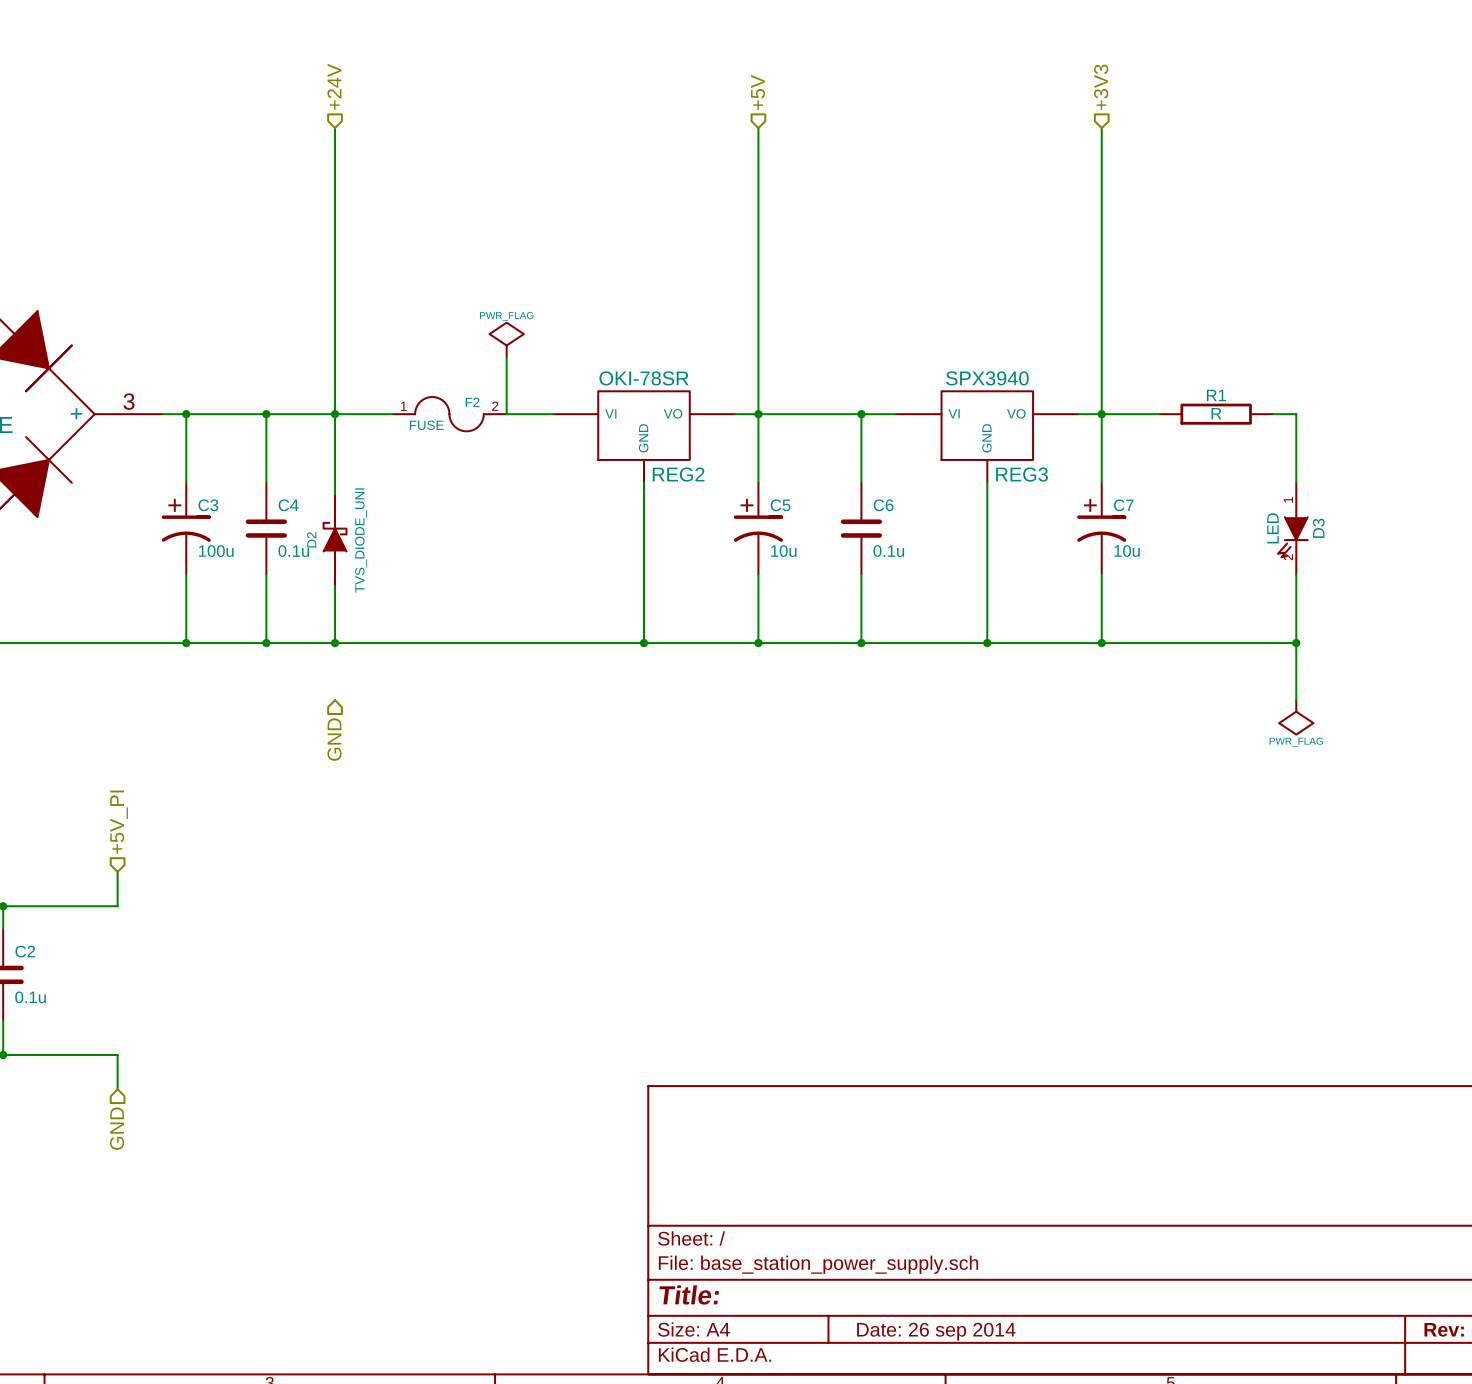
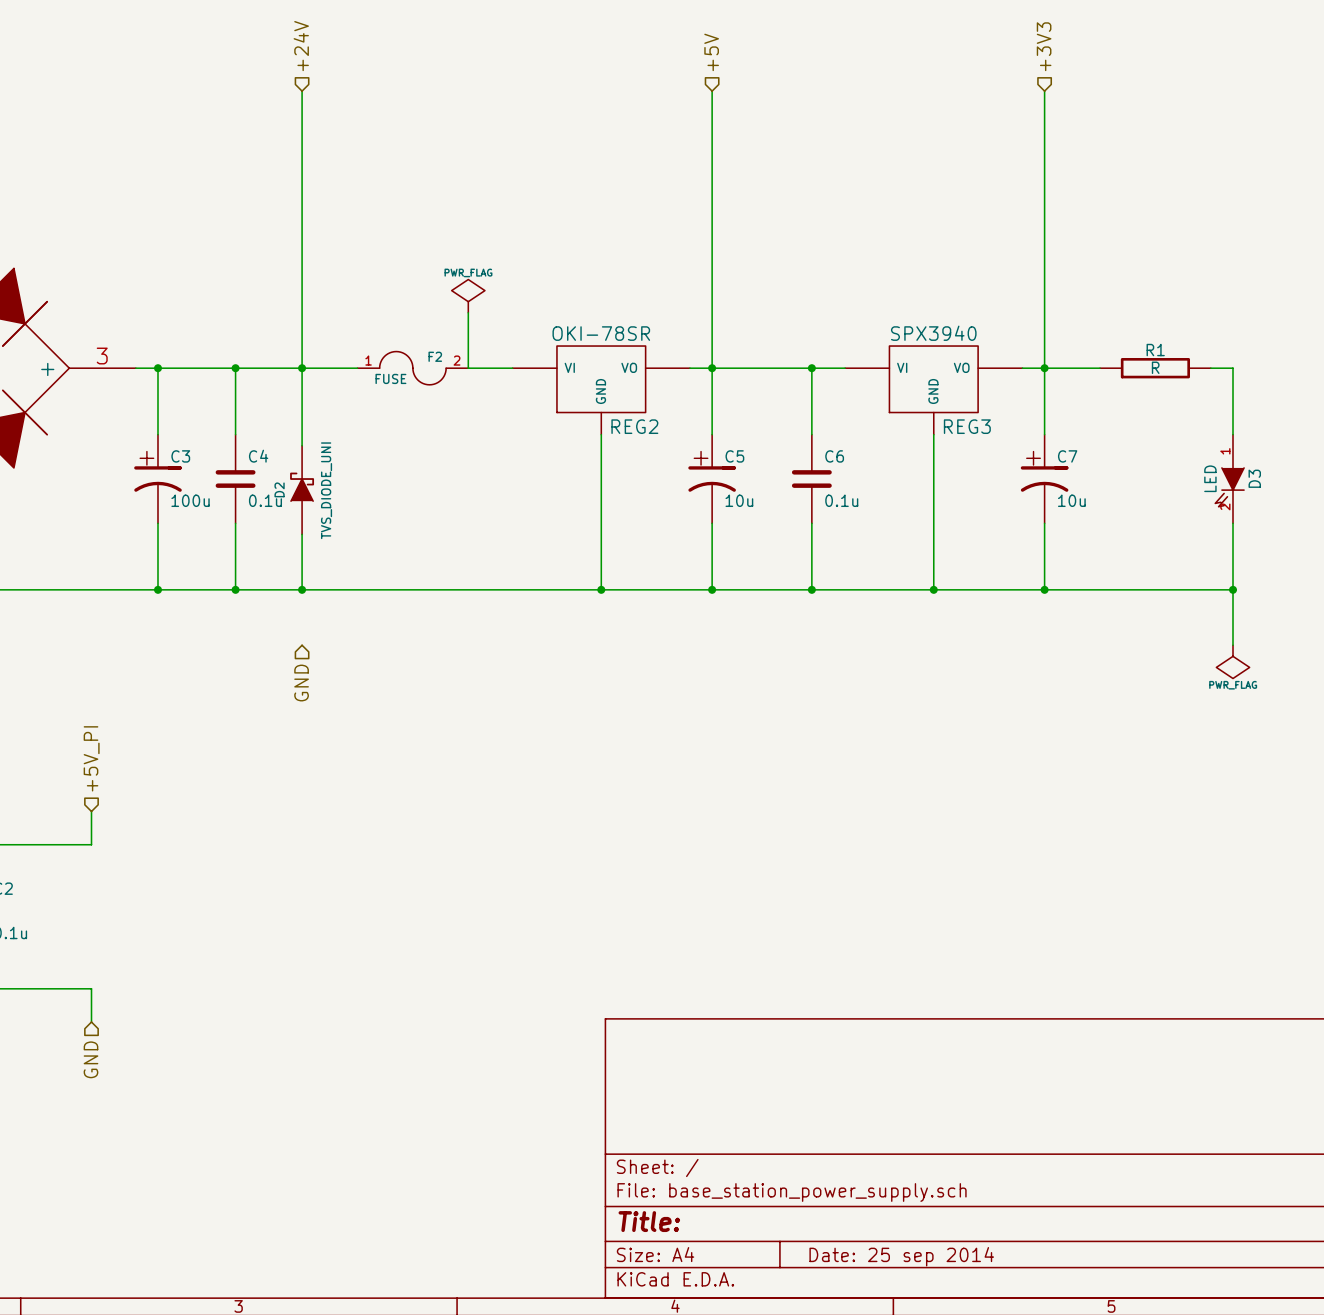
title block: Date: 26 sep 2014 (936, 1331) -> Date: 25 sep 2014 (901, 1256)

